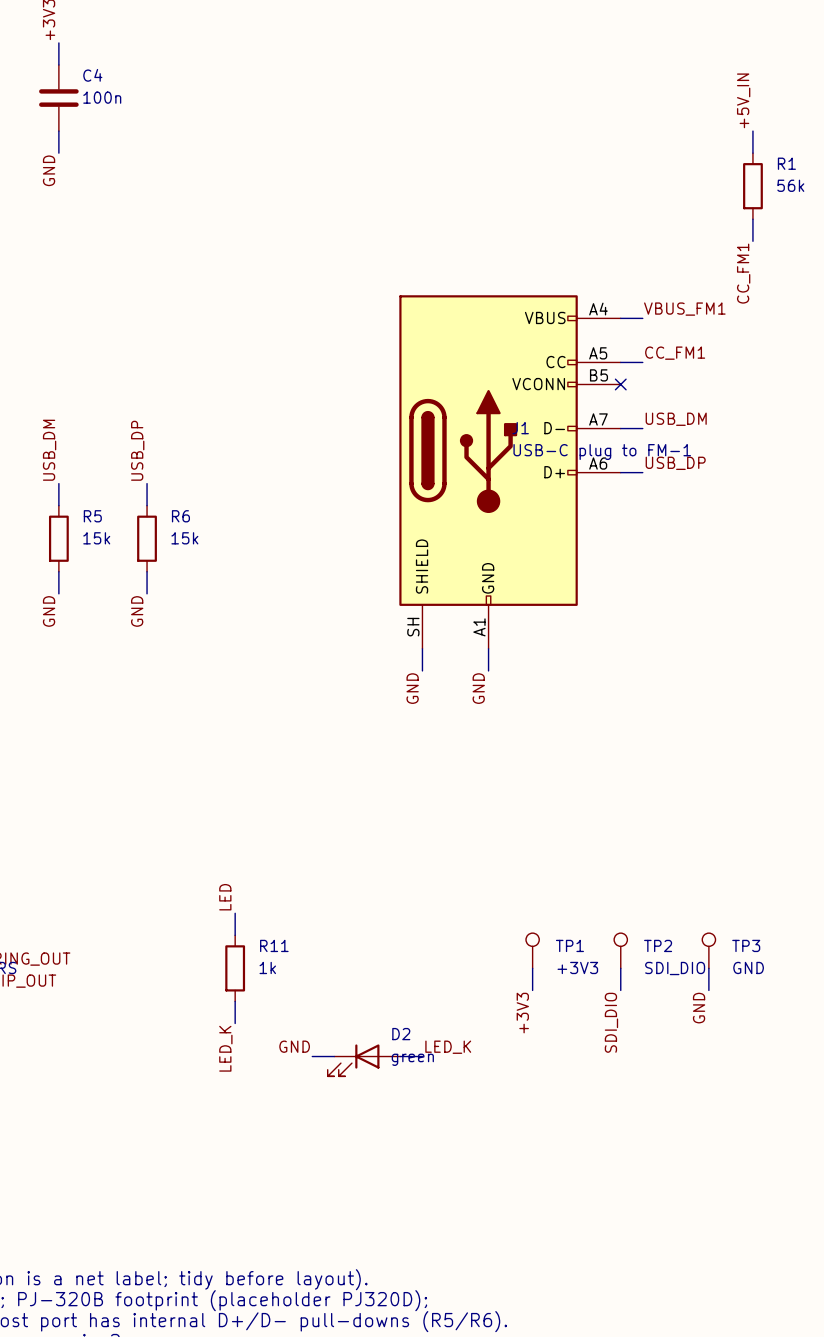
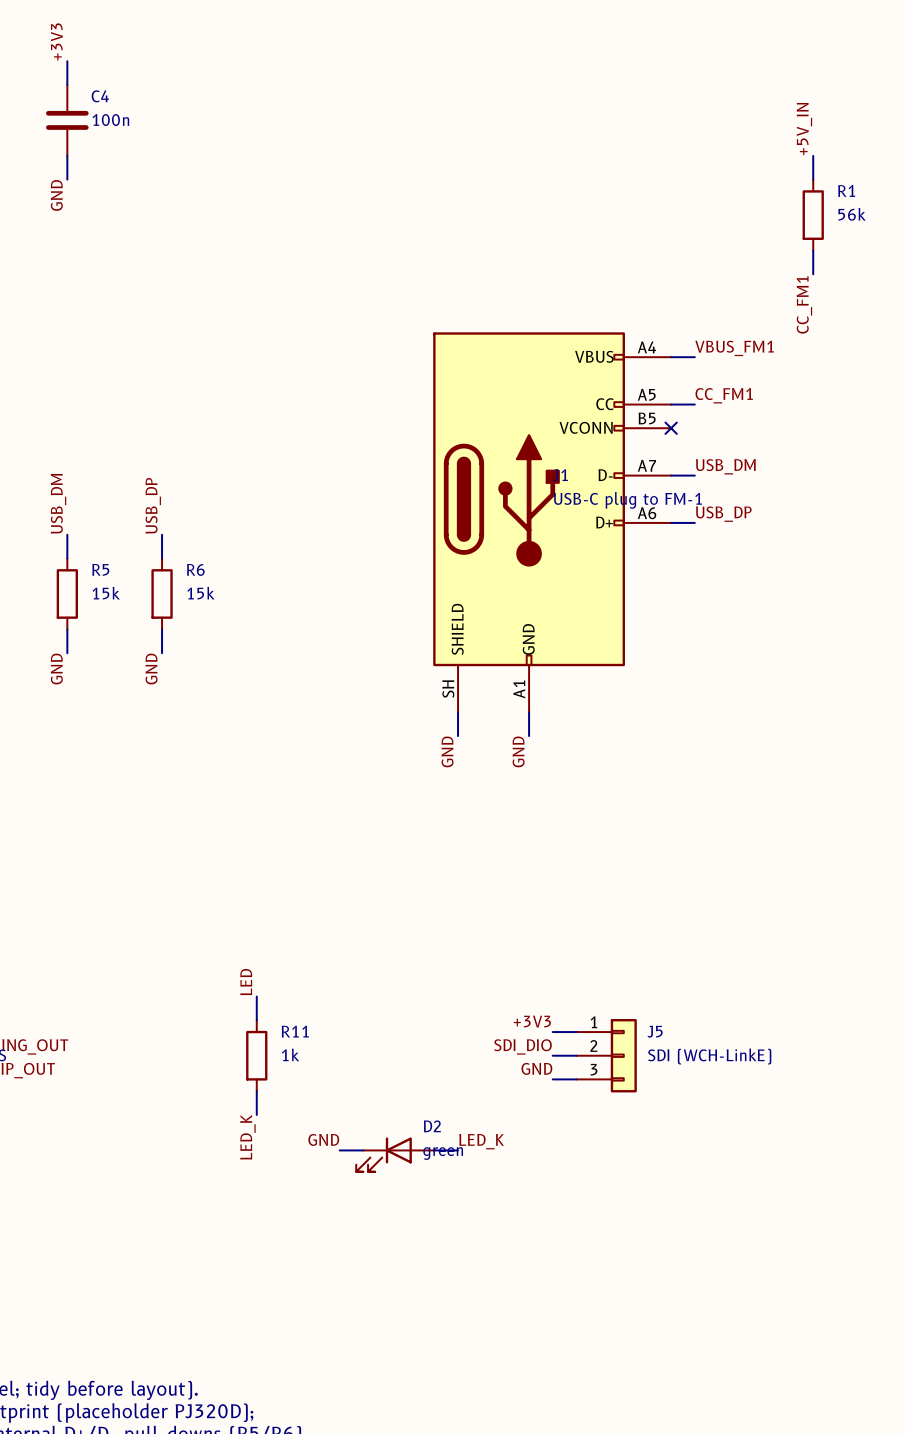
wire: none -> (552, 1032) (576, 1032)
TP1: +3V3 (532, 950) -> none
TP2: SDI_DIO (620, 950) -> none
TP3: GND (708, 950) -> none
wire: (532, 968) (532, 990) -> (576, 1055) (552, 1055)
J5: none -> SDI (WCH-LinkE) (606, 1055)
wire: (620, 968) (620, 990) -> none
wire: (708, 968) (708, 990) -> none
wire: none -> (552, 1079) (576, 1079)
label rotation: 0° (699, 1008) -> 90° clockwise (536, 1068)
label position: GND (699, 1008) -> GND (536, 1068)
label rotation: 0° (522, 1013) -> 90° clockwise (532, 1021)
label position: +3V3 (522, 1013) -> +3V3 (532, 1021)
label rotation: 0° (611, 1022) -> 90° clockwise (522, 1046)
label position: SDI_DIO (611, 1022) -> SDI_DIO (522, 1046)

